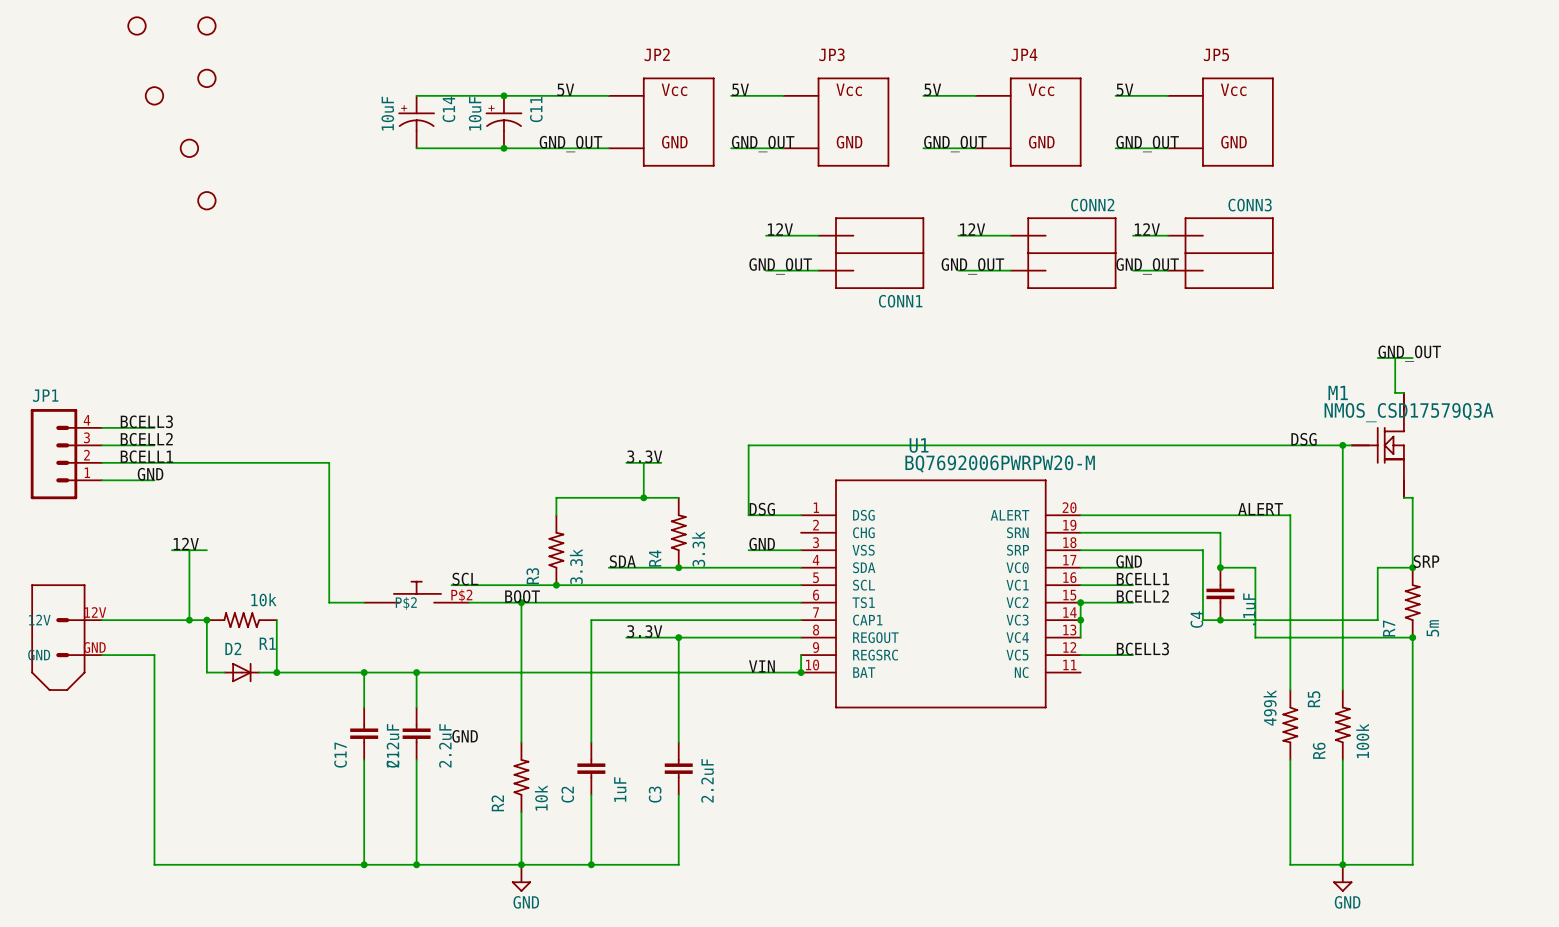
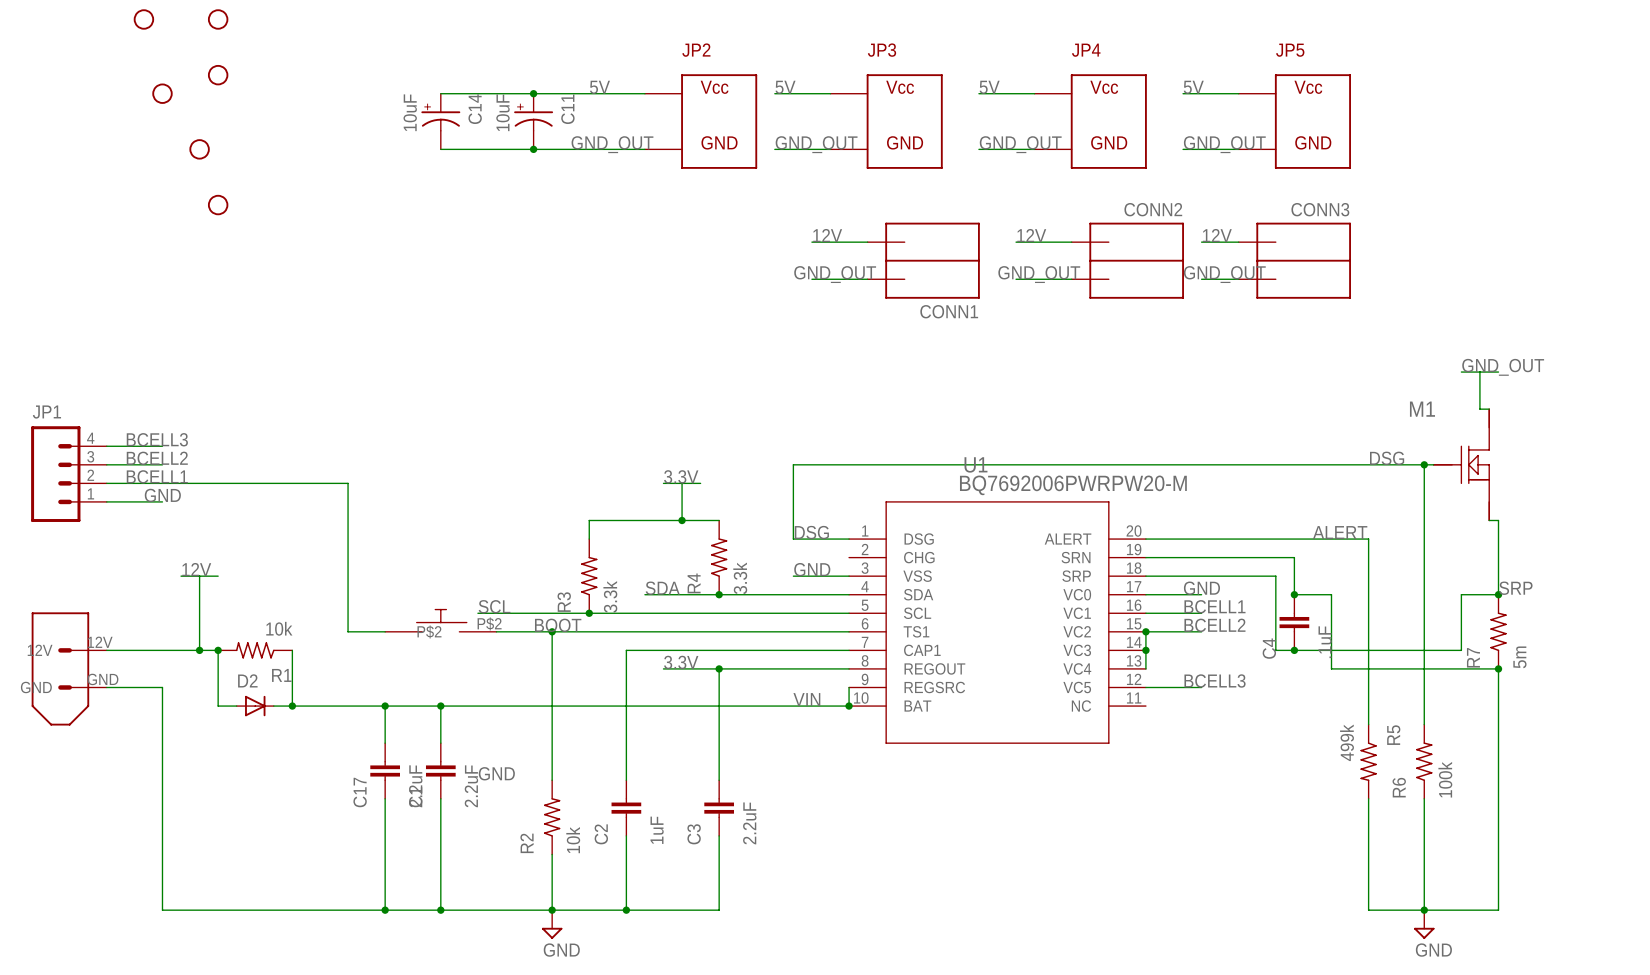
M1 value: NMOS_CSD17579Q3A (1409, 412) -> none

